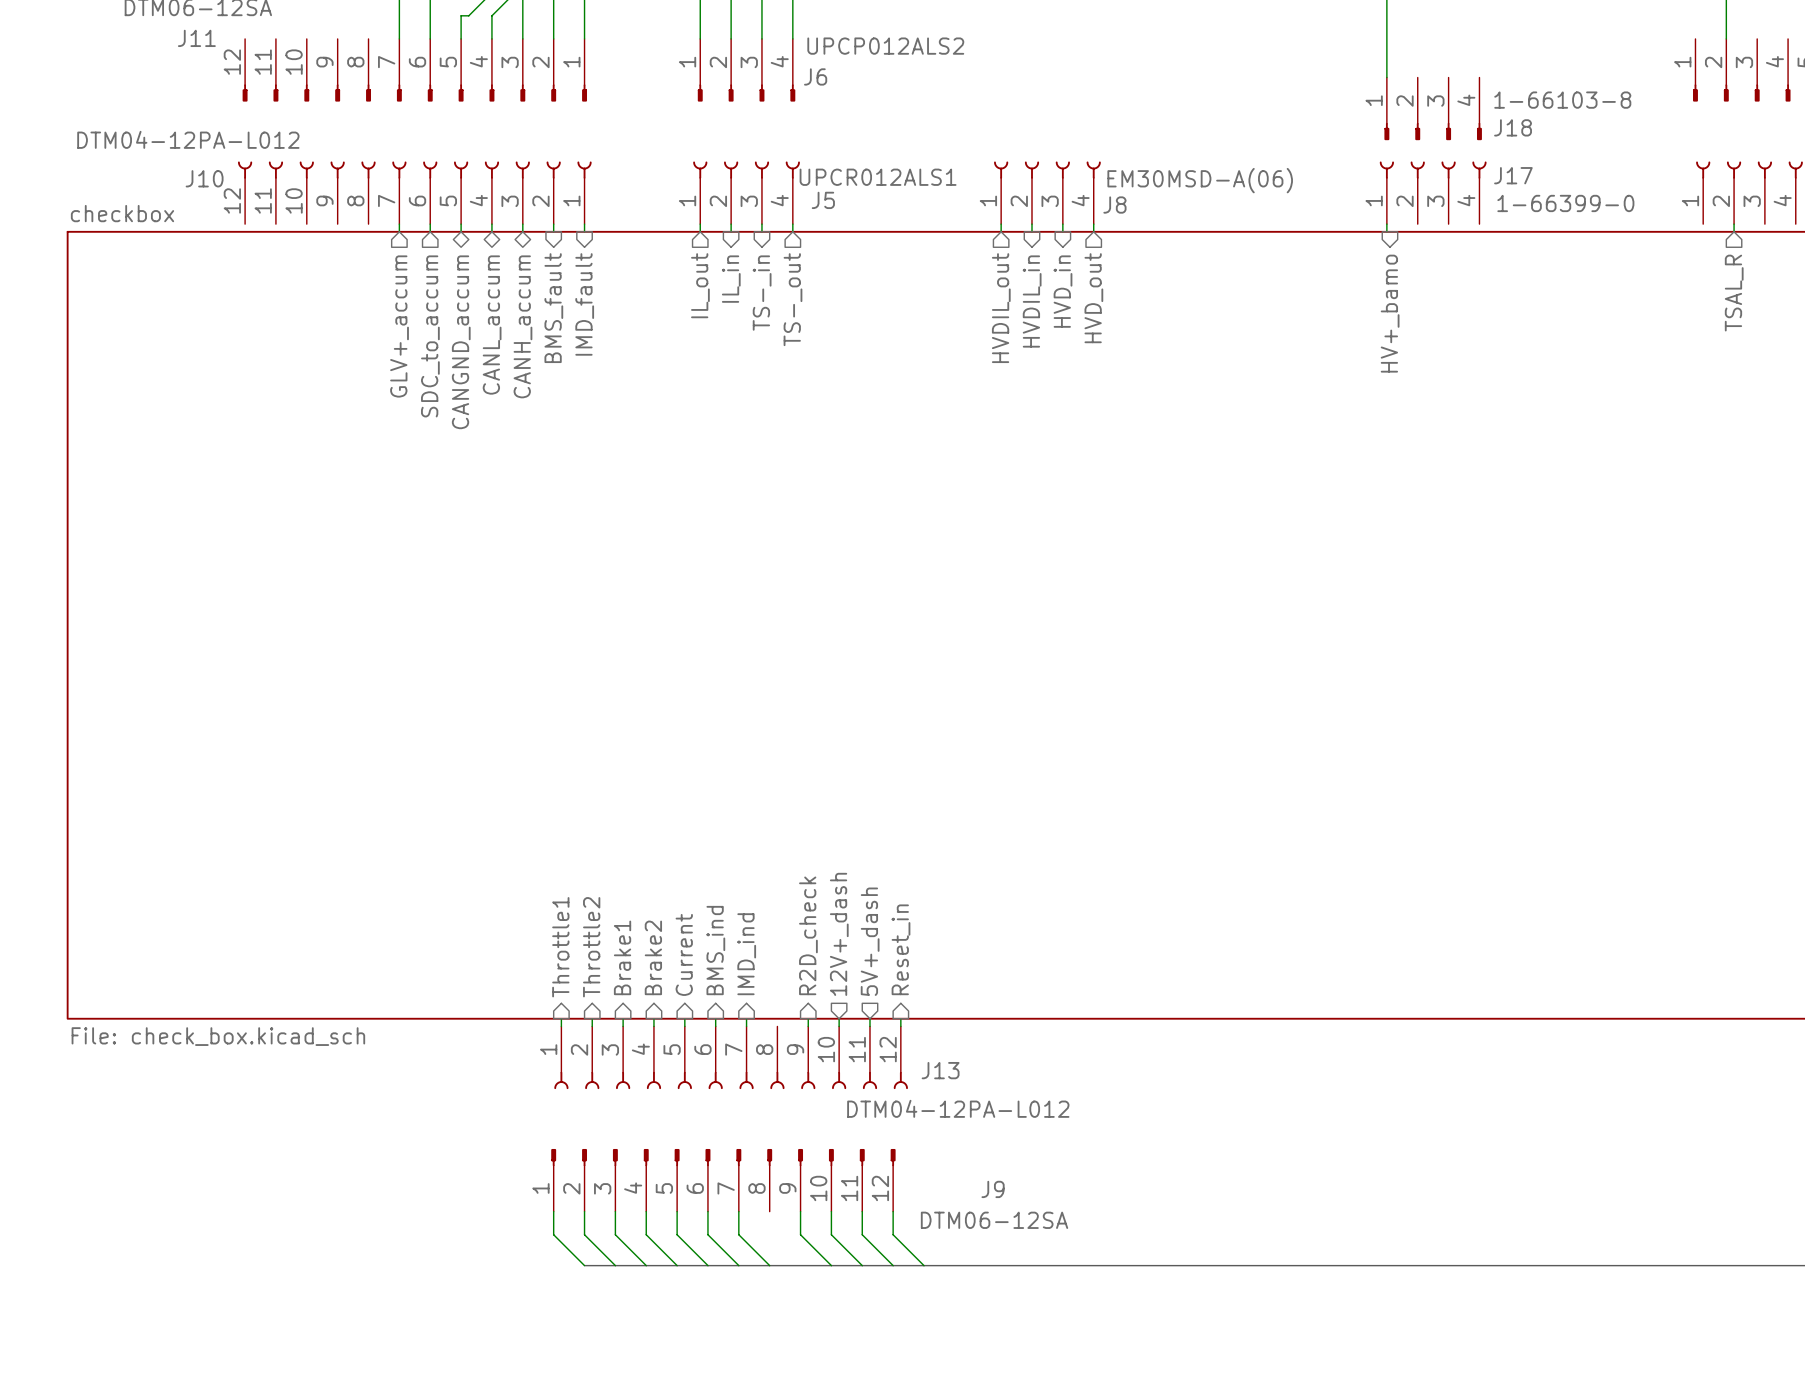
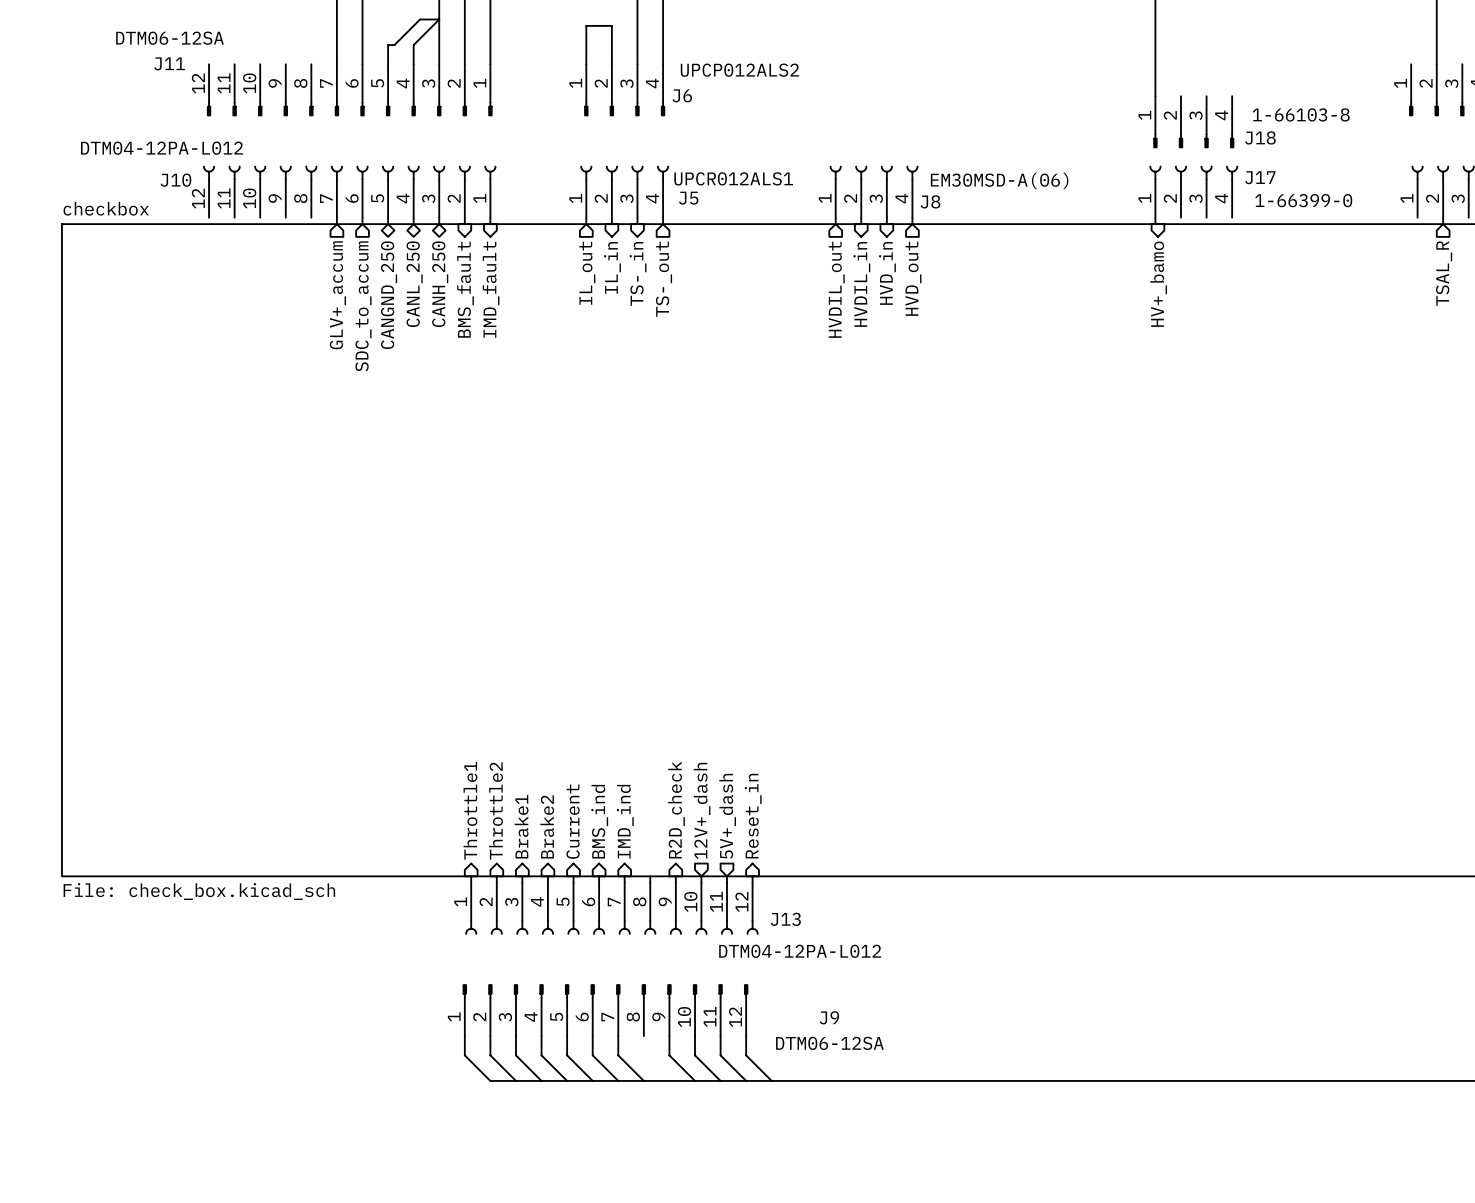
sheet pin: CANL_accum (492, 325) -> CANL_250 (414, 284)
sheet pin: CANH_accum (522, 326) -> CANH_250 (440, 284)
sheet pin: CANGND_accum (461, 342) -> CANGND_250 (389, 295)
wire: none -> (650, 876) (650, 882)

